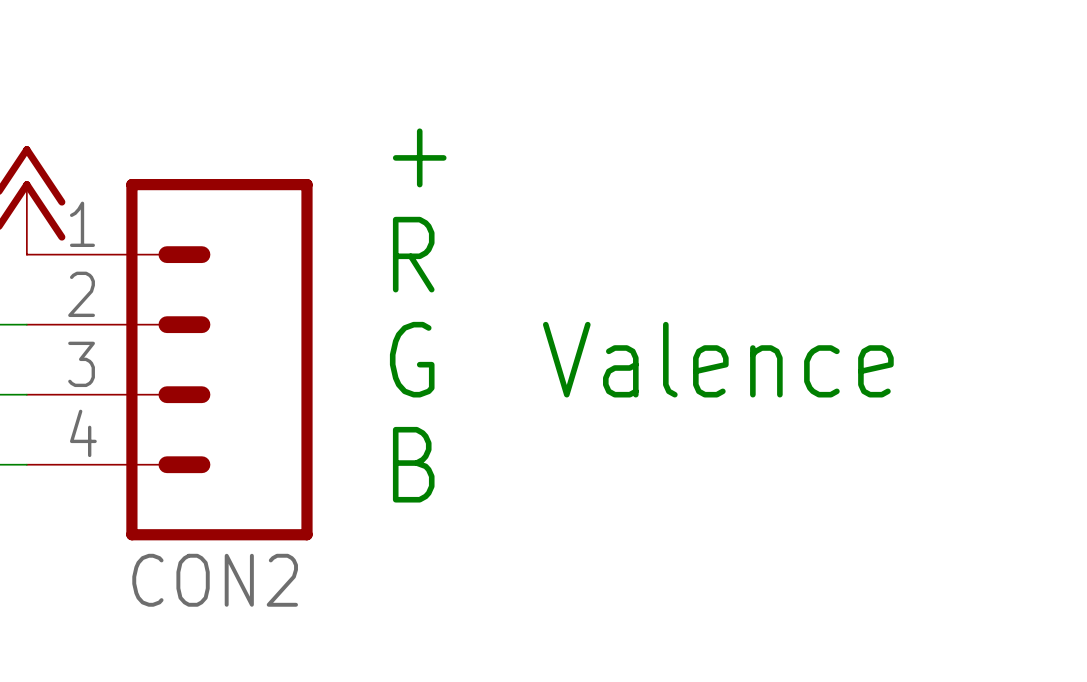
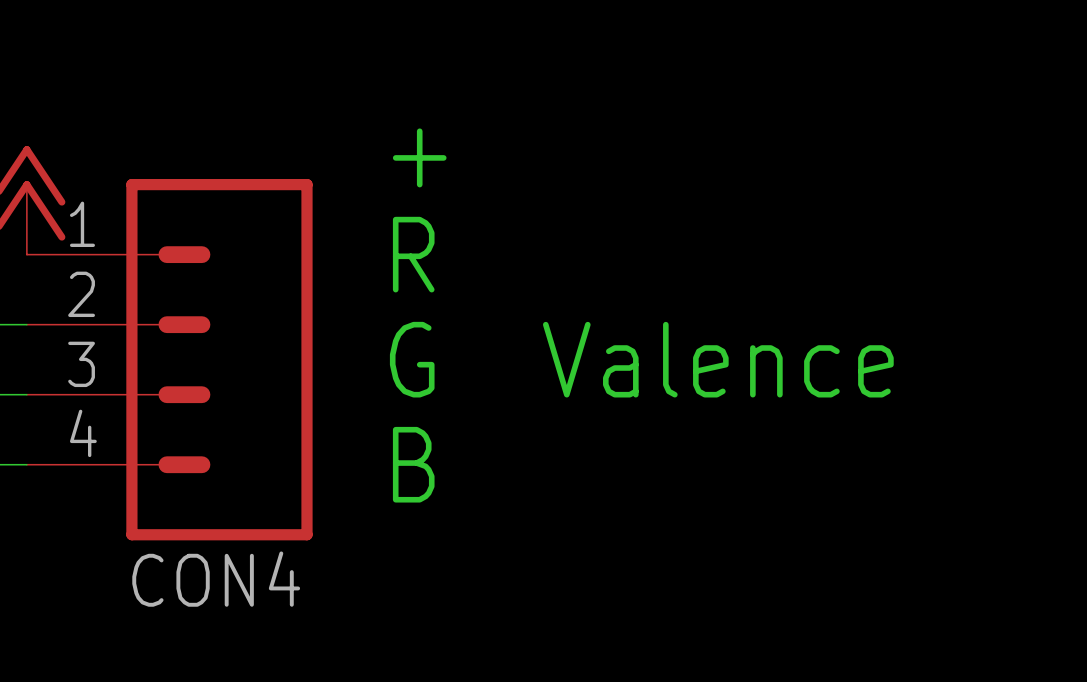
CON2 name: CON2 (215, 580) -> CON4 (216, 579)

